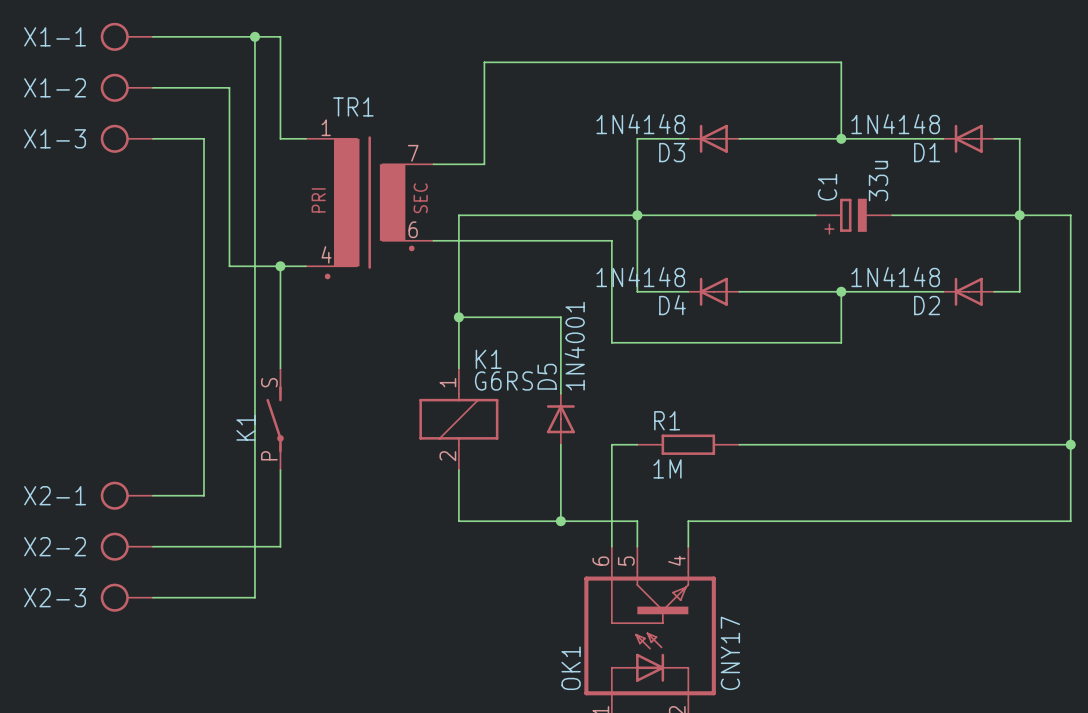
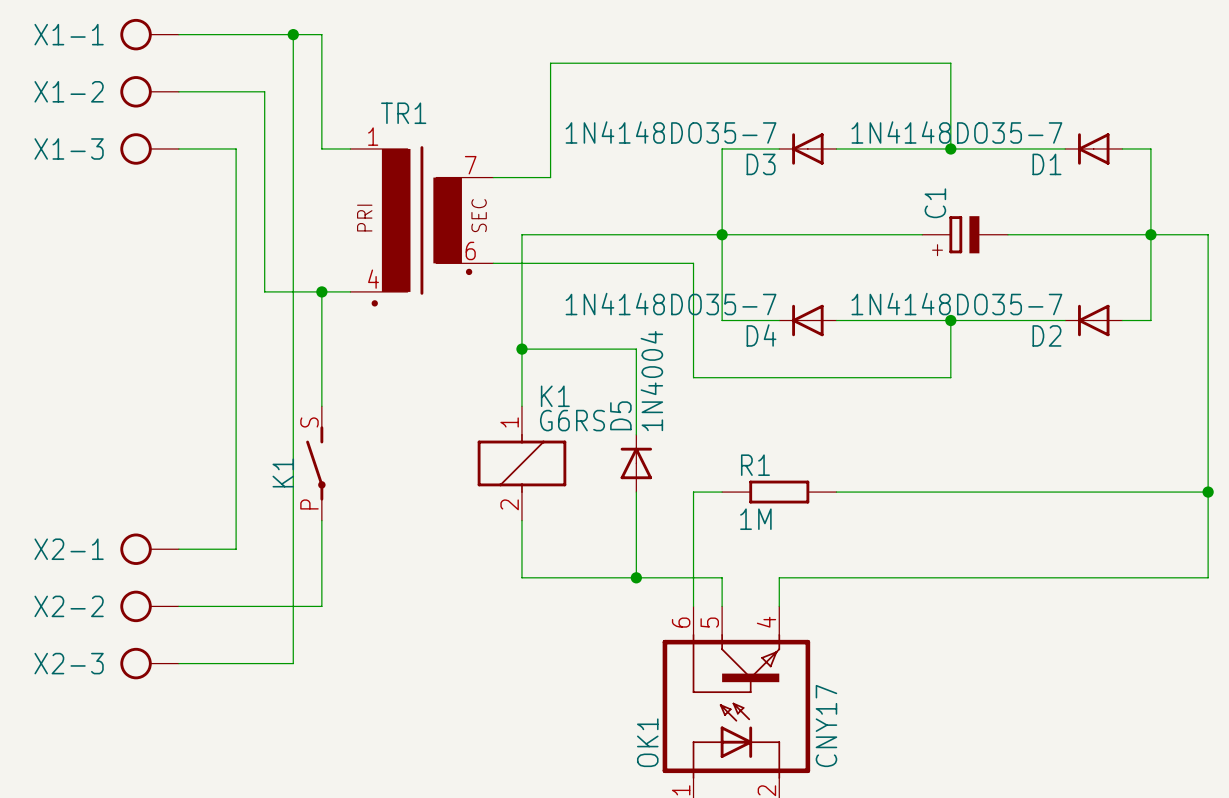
D3 value: 1N4148 (640, 124) -> 1N4148DO35-7 (671, 132)
D1 value: 1N4148 (895, 124) -> 1N4148DO35-7 (956, 132)
C1 value: 33u (878, 181) -> none
D4 value: 1N4148 (640, 277) -> 1N4148DO35-7 (671, 304)
D2 value: 1N4148 (895, 277) -> 1N4148DO35-7 (956, 304)
D5 value: 1N4001 (574, 346) -> 1N4004 (651, 381)

